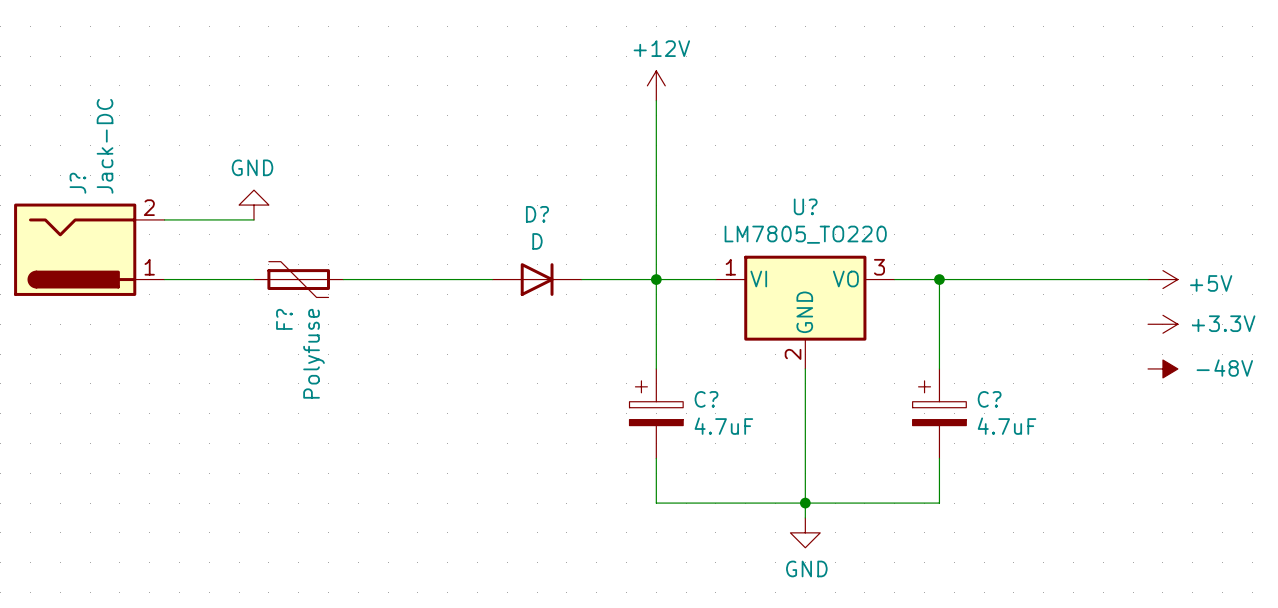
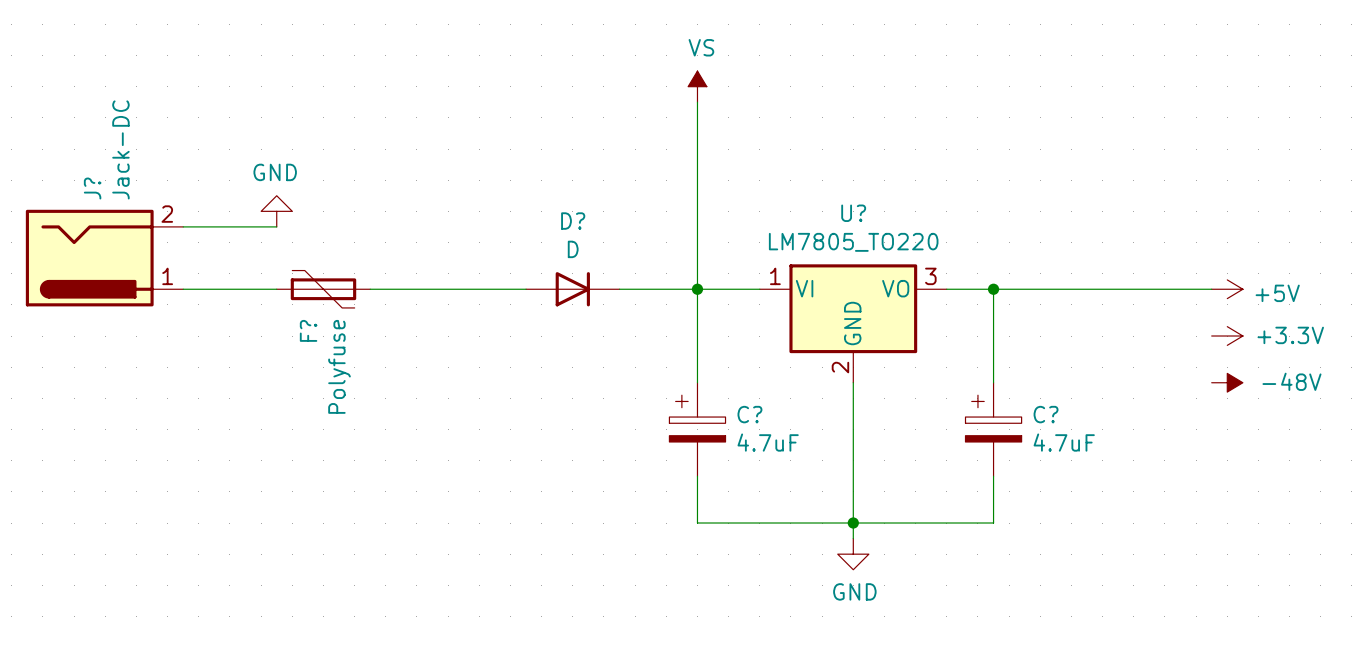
power symbol: +12V (656, 85) -> VS (697, 86)

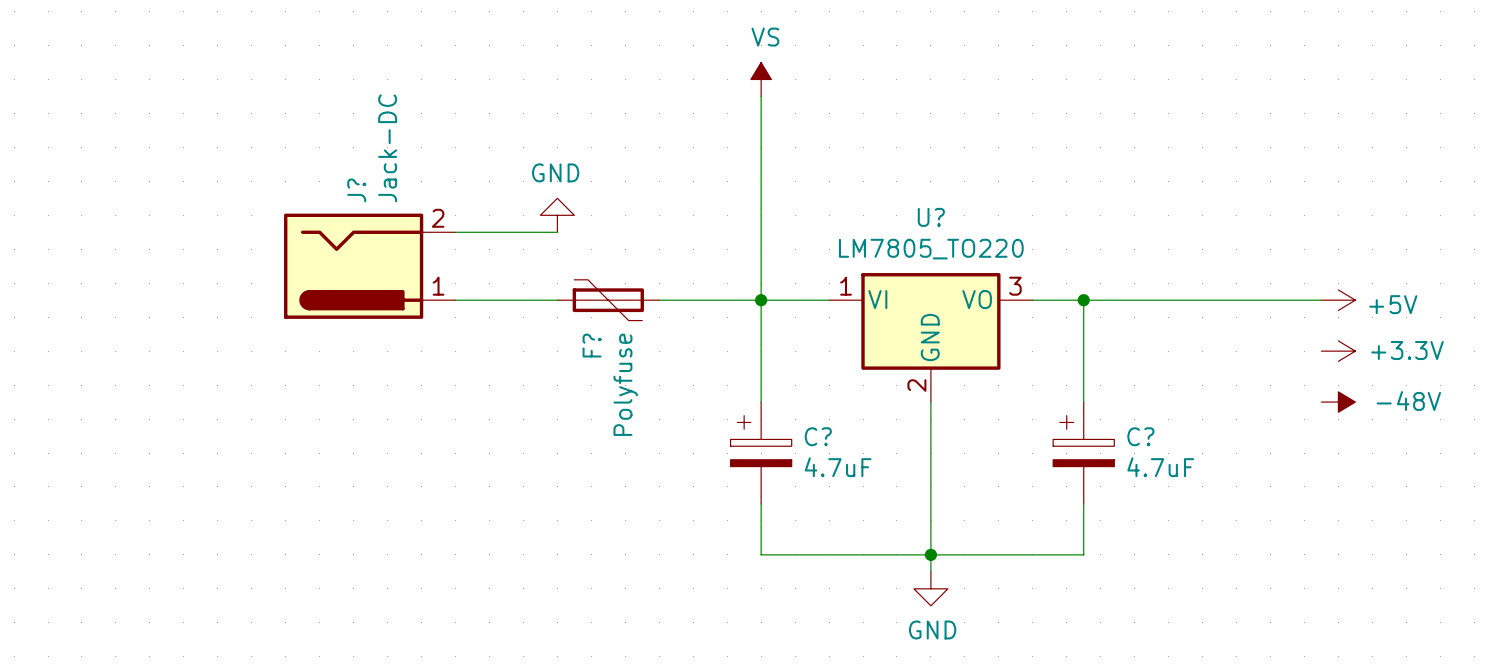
power symbol position: GND (276, 211) -> GND (557, 215)
wire: (183, 226) (276, 226) -> (455, 232) (557, 232)
J? position: (104, 258) -> (369, 266)
wire: (183, 289) (276, 289) -> none
F? position: (323, 289) -> (608, 300)
D?: D (572, 289) -> none

